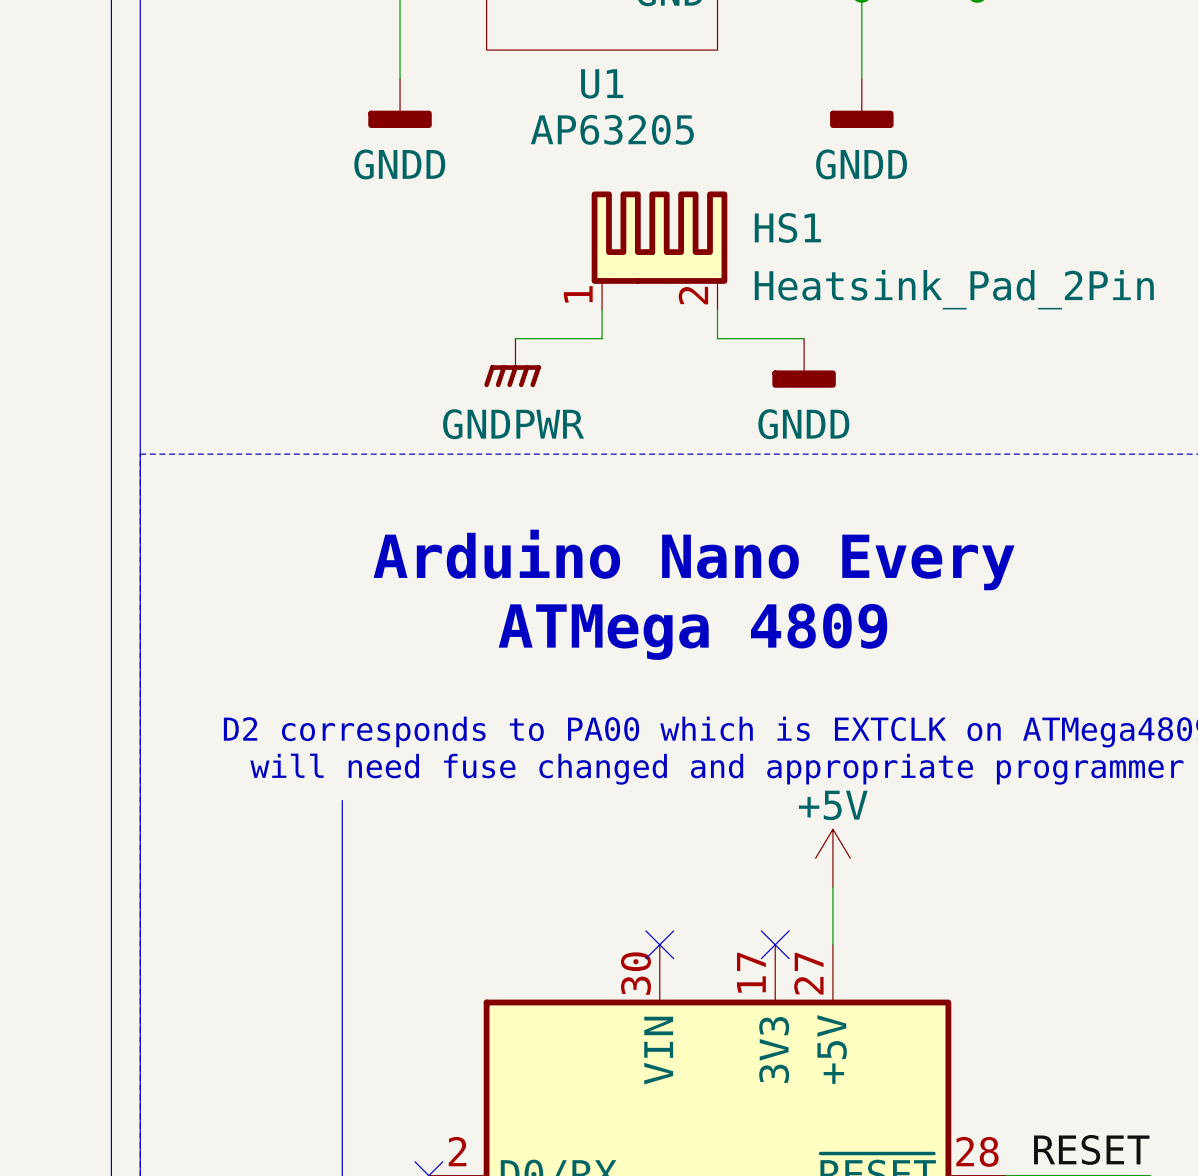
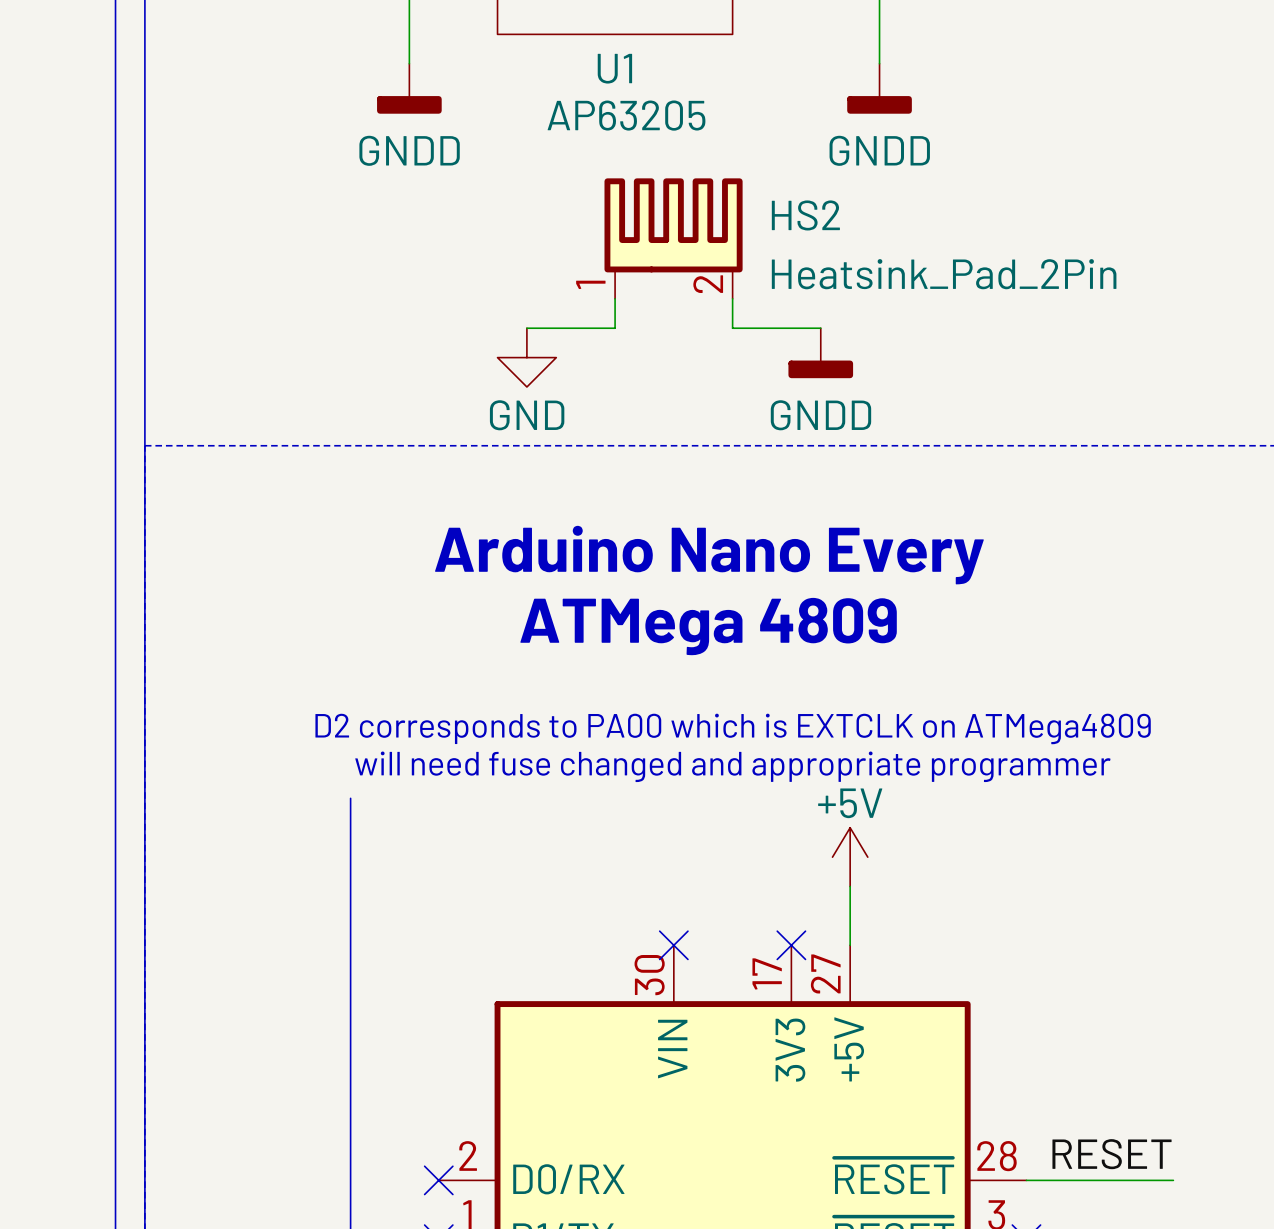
HS1 name: HS1 (787, 227) -> HS2 (805, 215)
power symbol: GNDPWR (512, 362) -> GND (526, 357)

